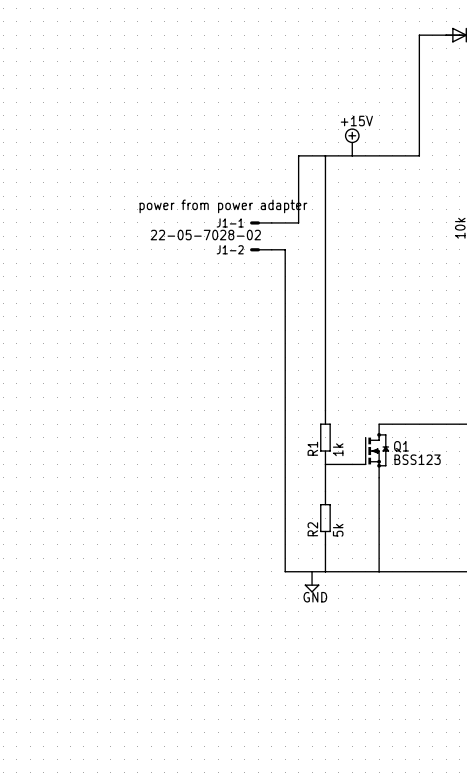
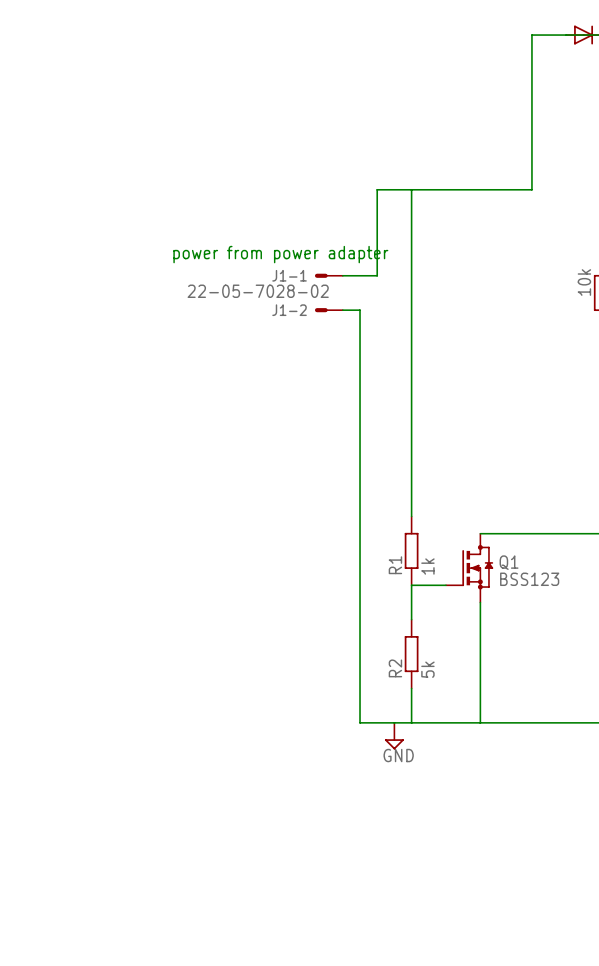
power symbol: +15V (352, 142) -> none

